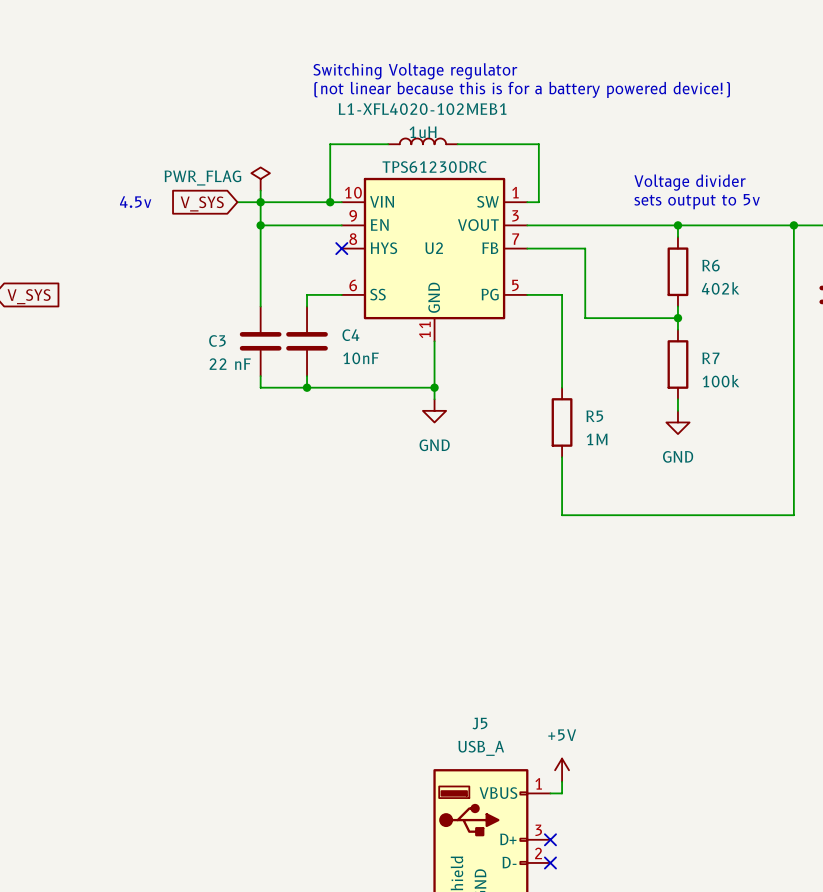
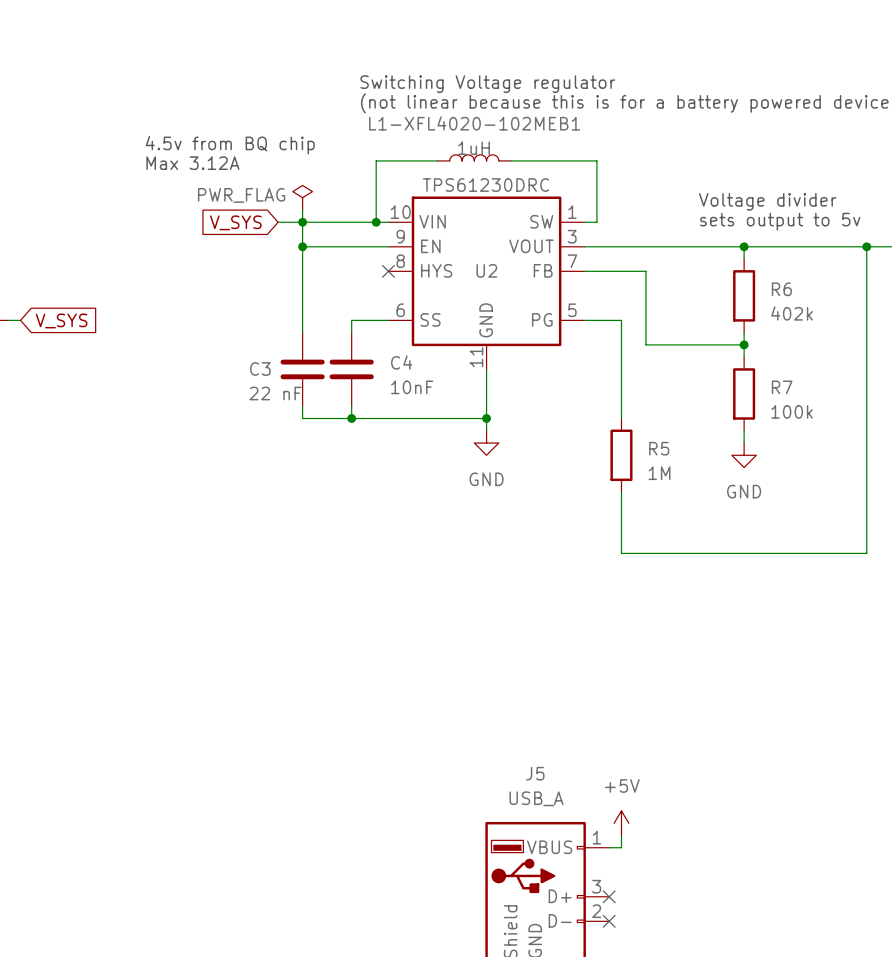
text: none -> 4.5v from BQ chip (230, 145)
text: none -> Max 3.12A (192, 163)
text: 4.5v (135, 202) -> none

